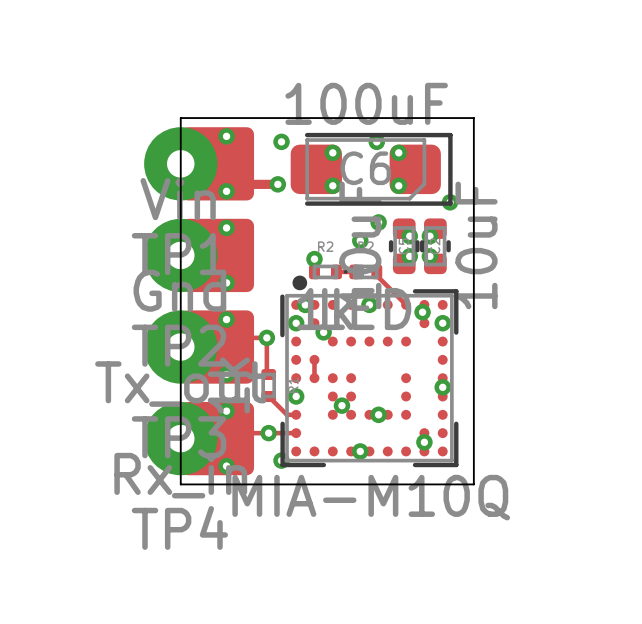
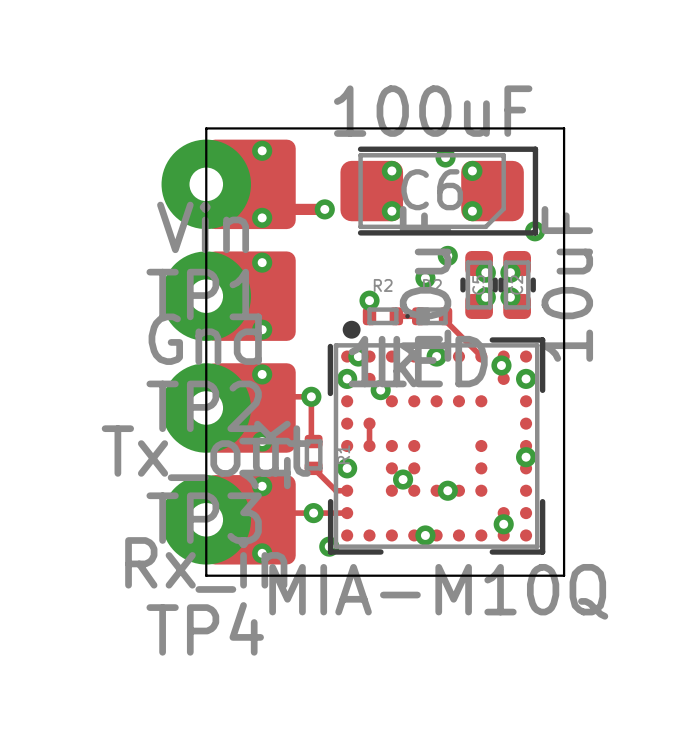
via: (281, 141) -> none

